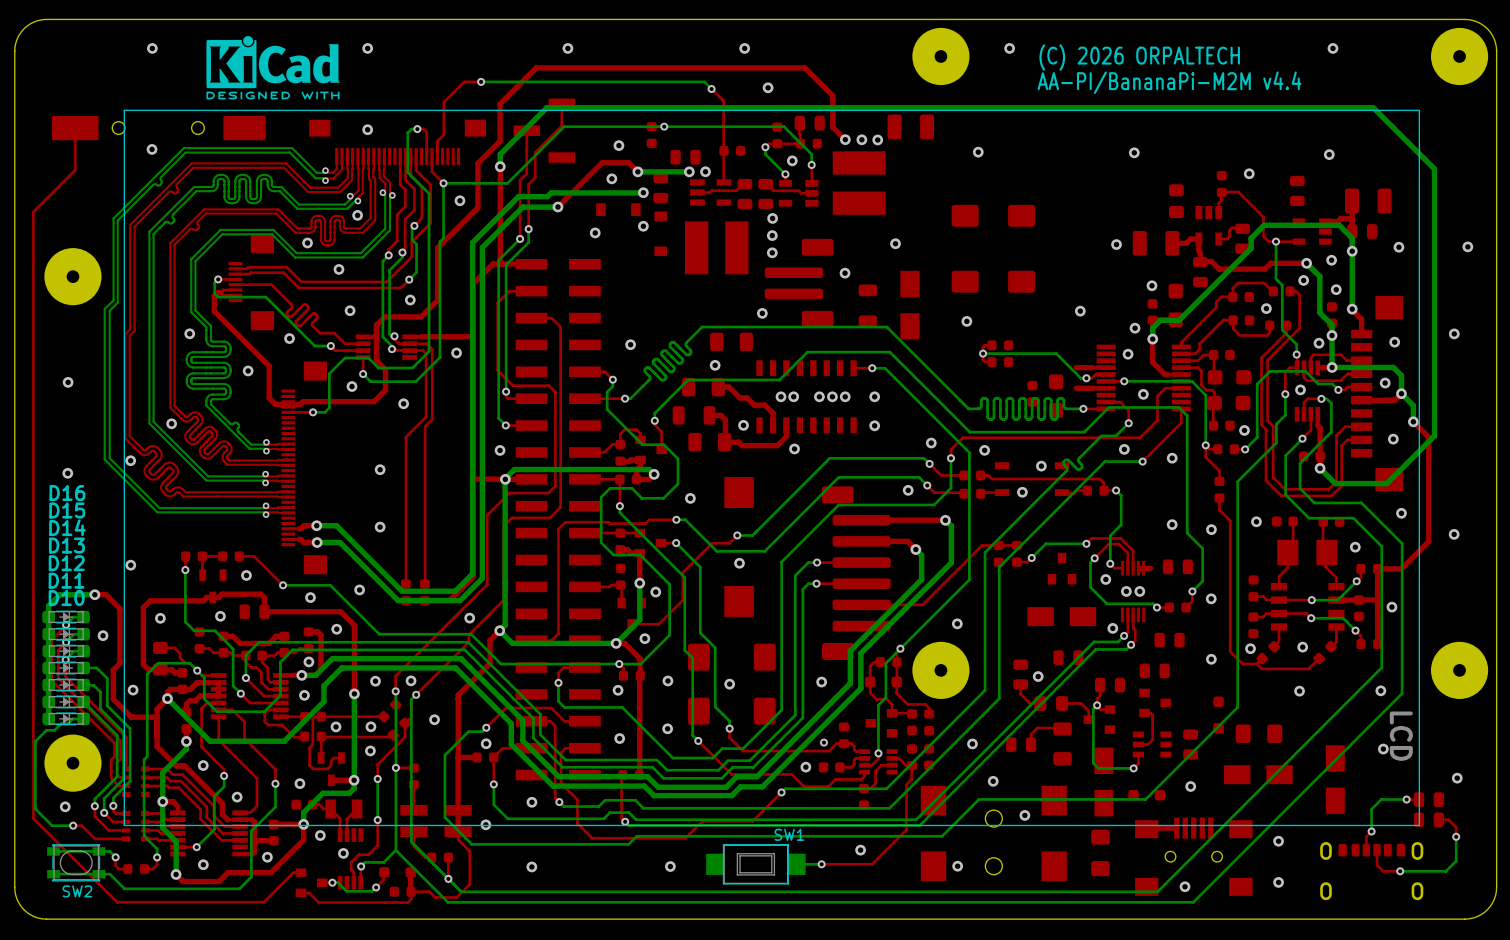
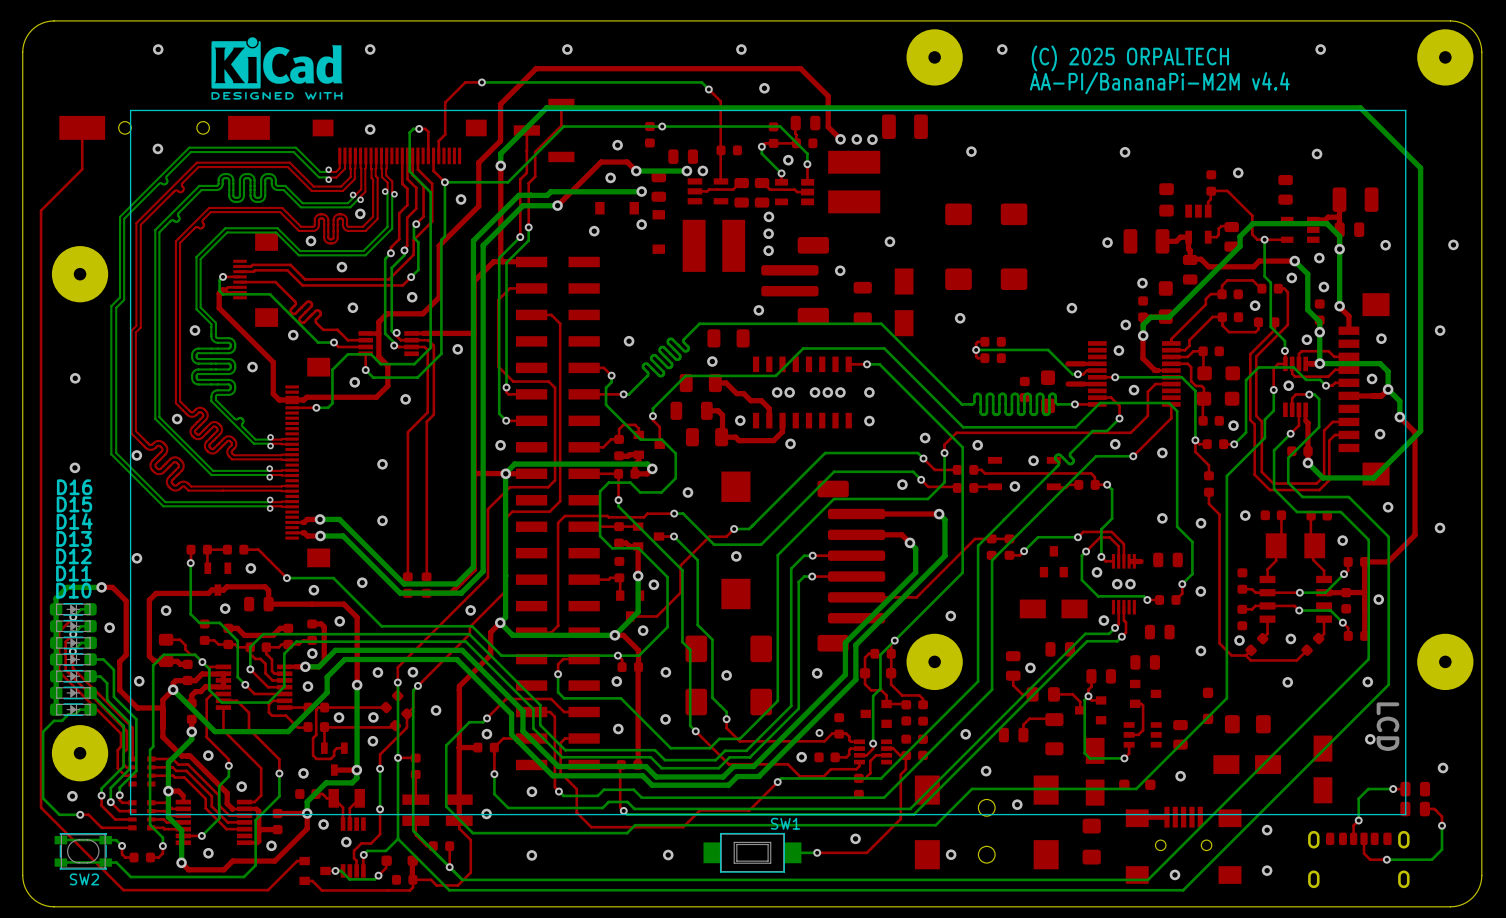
text: (C) 2026 ORPALTECH (1139, 57) -> (C) 2025 ORPALTECH (1130, 58)

